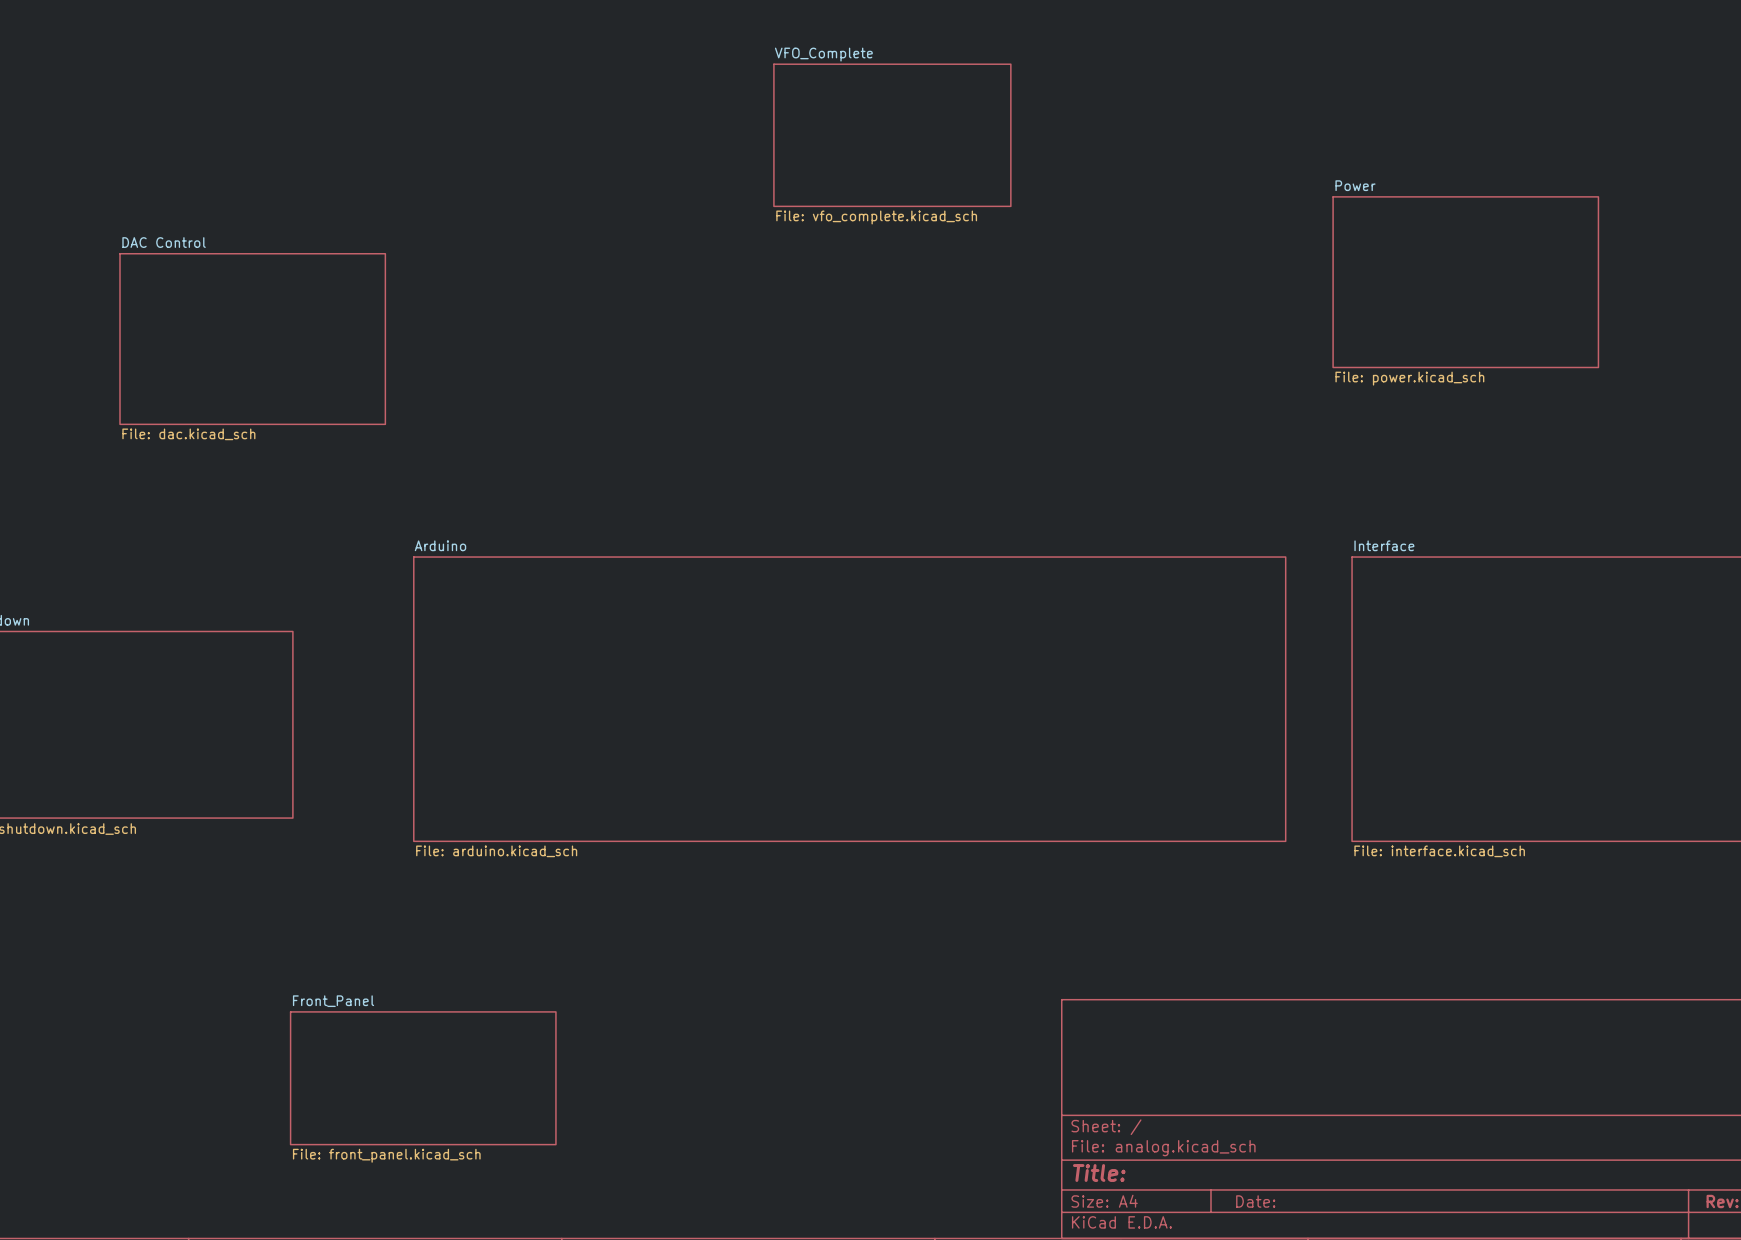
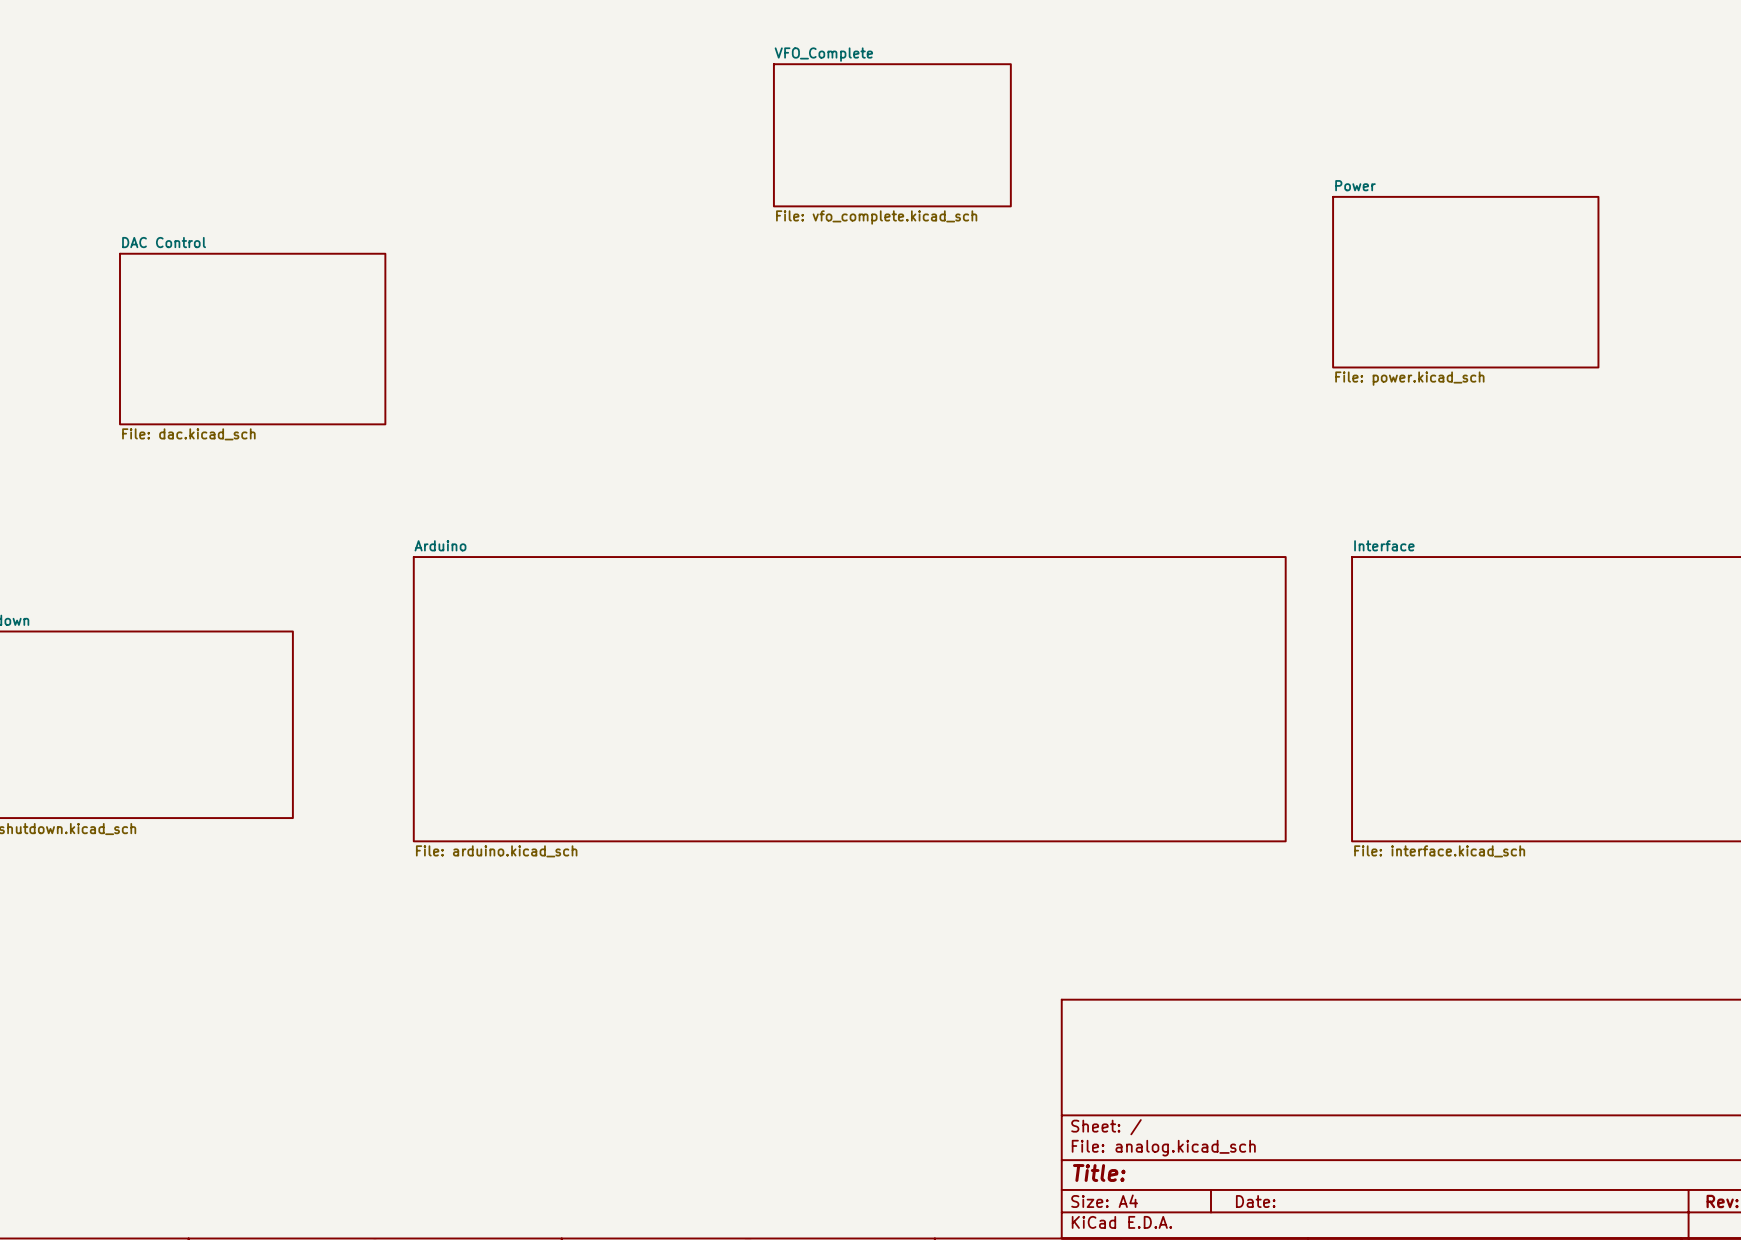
sheet Front_Panel: File: front_panel.kicad_sch (423, 1078) -> none

